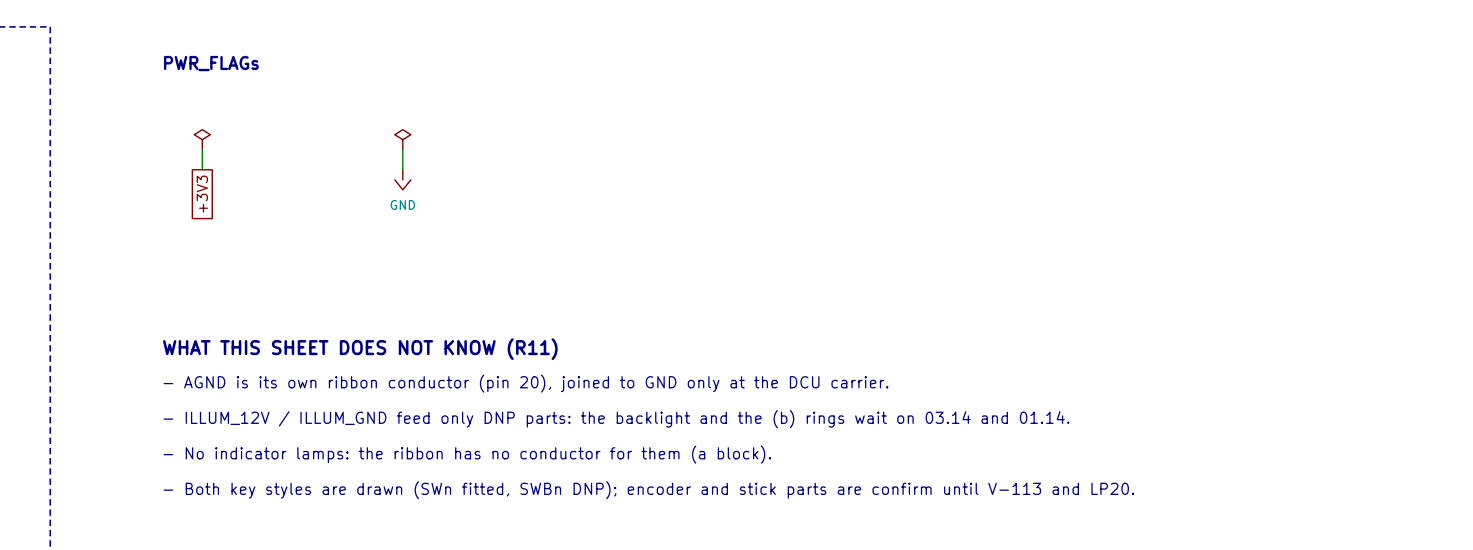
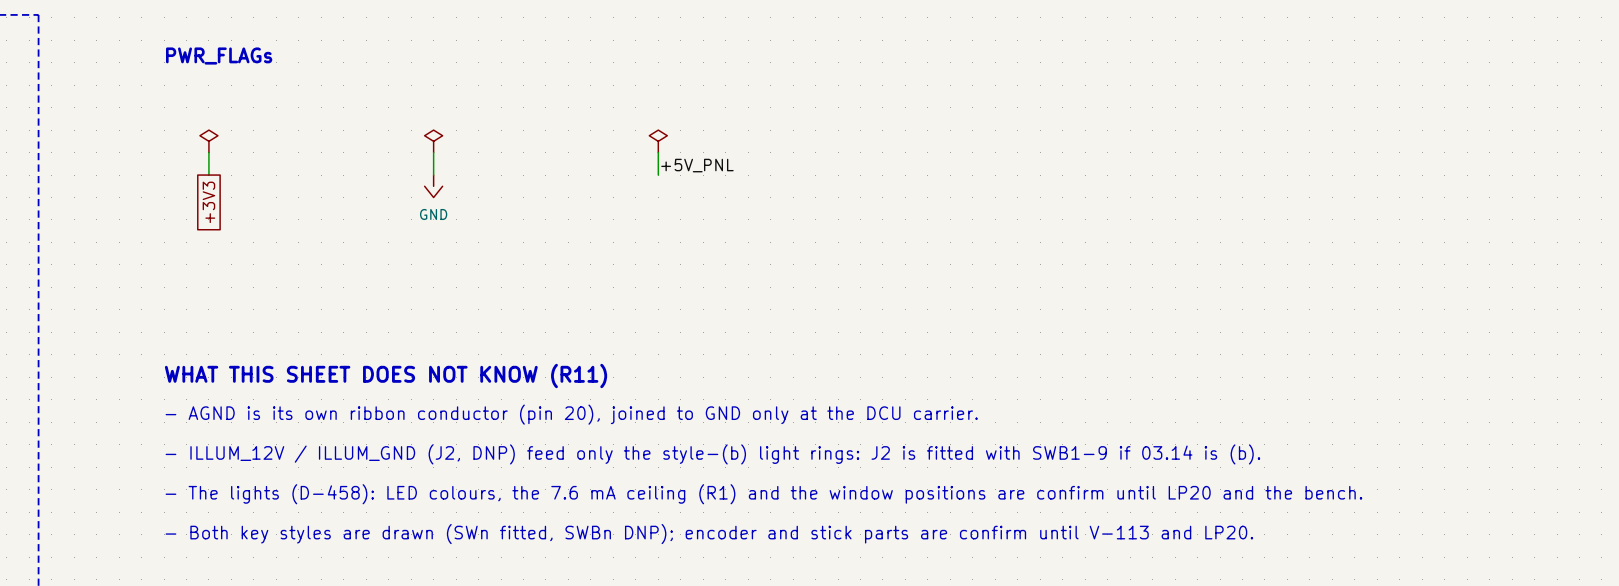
power symbol: none -> (658, 141)
wire: none -> (658, 152) (658, 175)
label: none -> +5V_PNL (697, 165)
text: - ILLUM_12V / ILLUM_GND feed only DNP parts: the backlight and the (b) rings wait on 03.14 and 01.14. (616, 419) -> - ILLUM_12V / ILLUM_GND (J2, DNP) feed only the style-(b) light rings: J2 is fitted with SWB1-9 if 03.14 is (b). (712, 454)
text: - No indicator lamps: the ribbon has no conductor for them (a block). (467, 454) -> - The lights (D-458): LED colours, the 7.6 mA ceiling (R1) and the window positions are confirm until LP20 and the bench. (763, 494)

